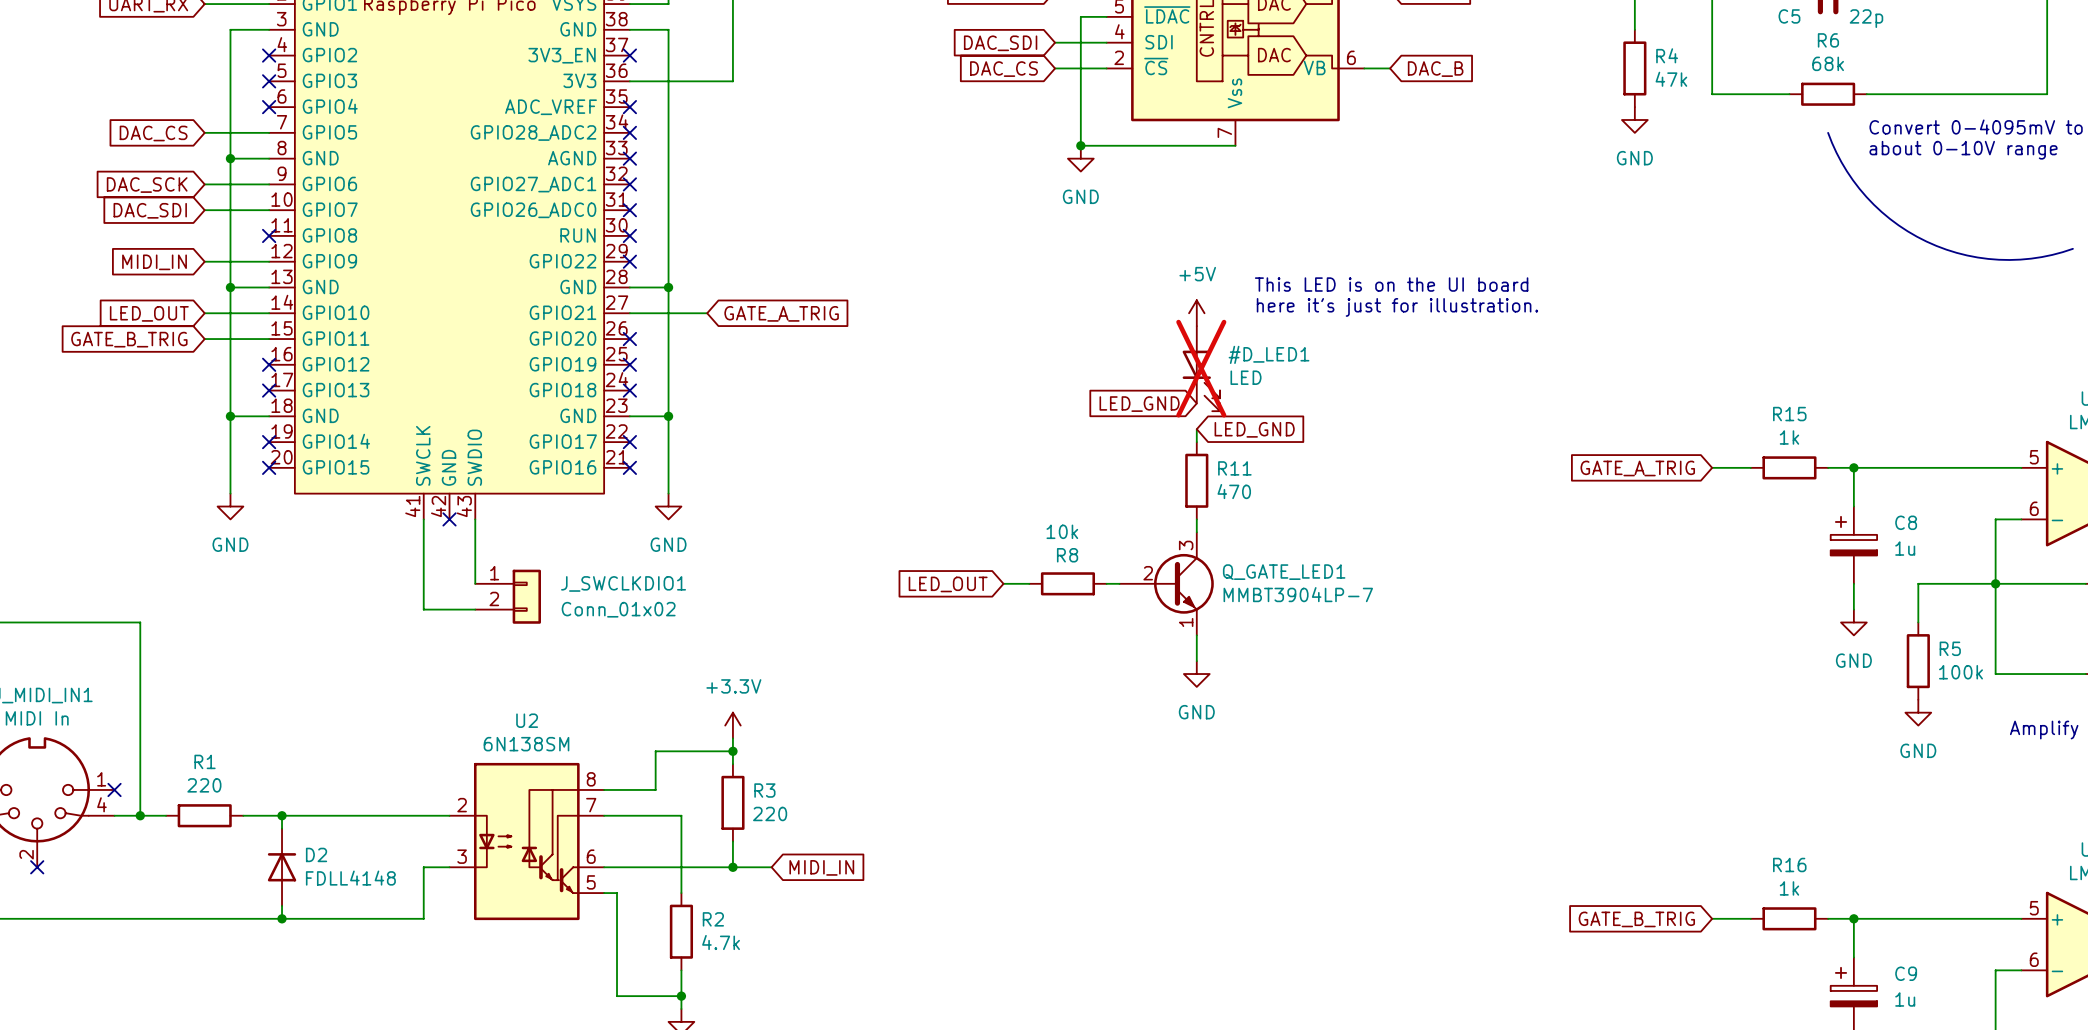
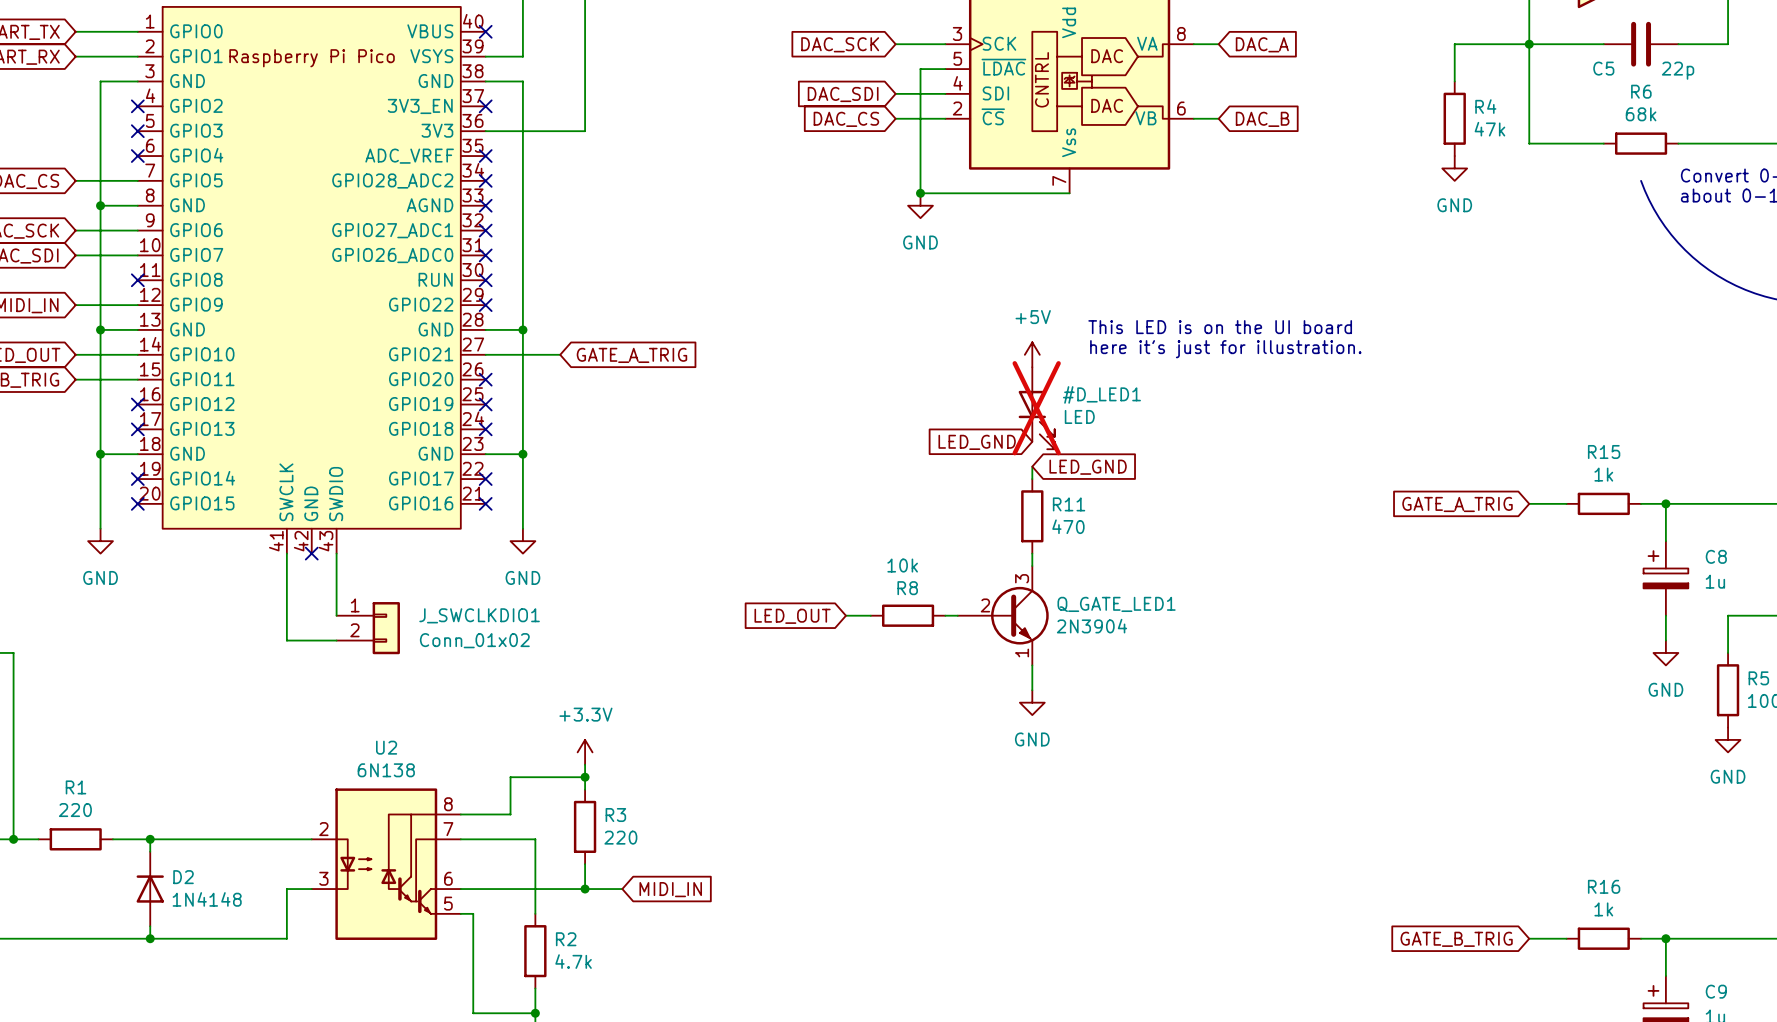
Q_GATE_LED1 value: MMBT3904LP-7 (1298, 594) -> 2N3904 (1091, 626)
U2 value: 6N138SM (526, 744) -> 6N138 (386, 770)
D2 value: FDLL4148 (350, 878) -> 1N4148 (207, 899)

